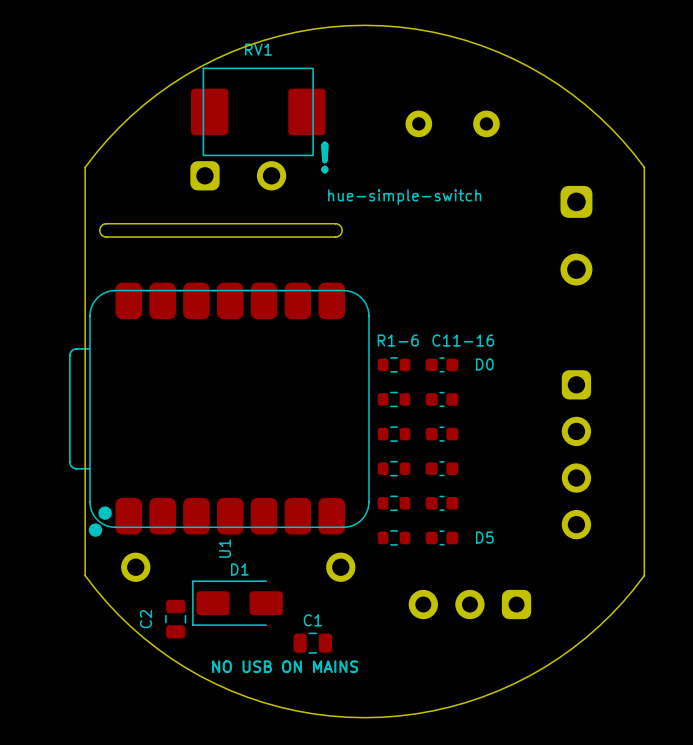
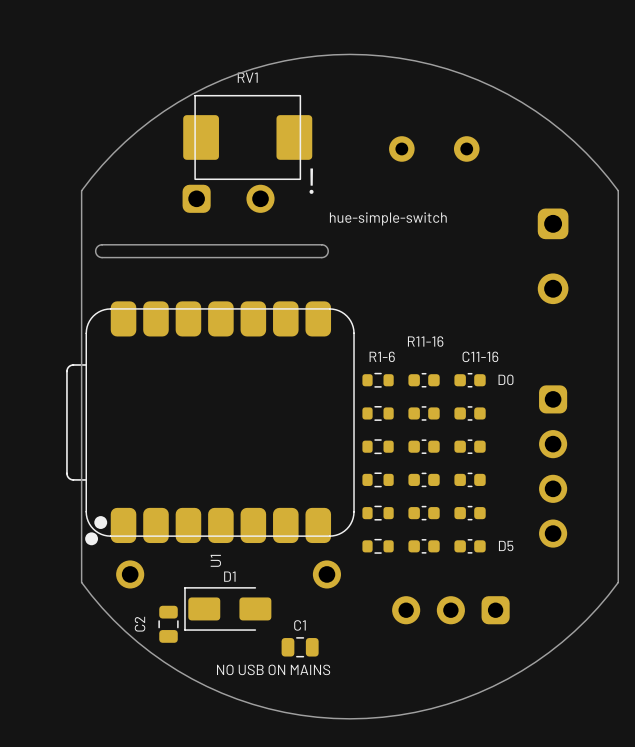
text: none -> R11-16 (425, 341)
text position: C11-16 (463, 340) -> C11-16 (480, 356)
text position: D0 (484, 364) -> D0 (505, 379)
part: none -> (470, 380)
part: none -> (470, 413)
part: none -> (470, 446)
part: none -> (470, 479)
part: none -> (470, 513)
text position: D5 (484, 537) -> D5 (506, 546)
part: none -> (470, 546)

